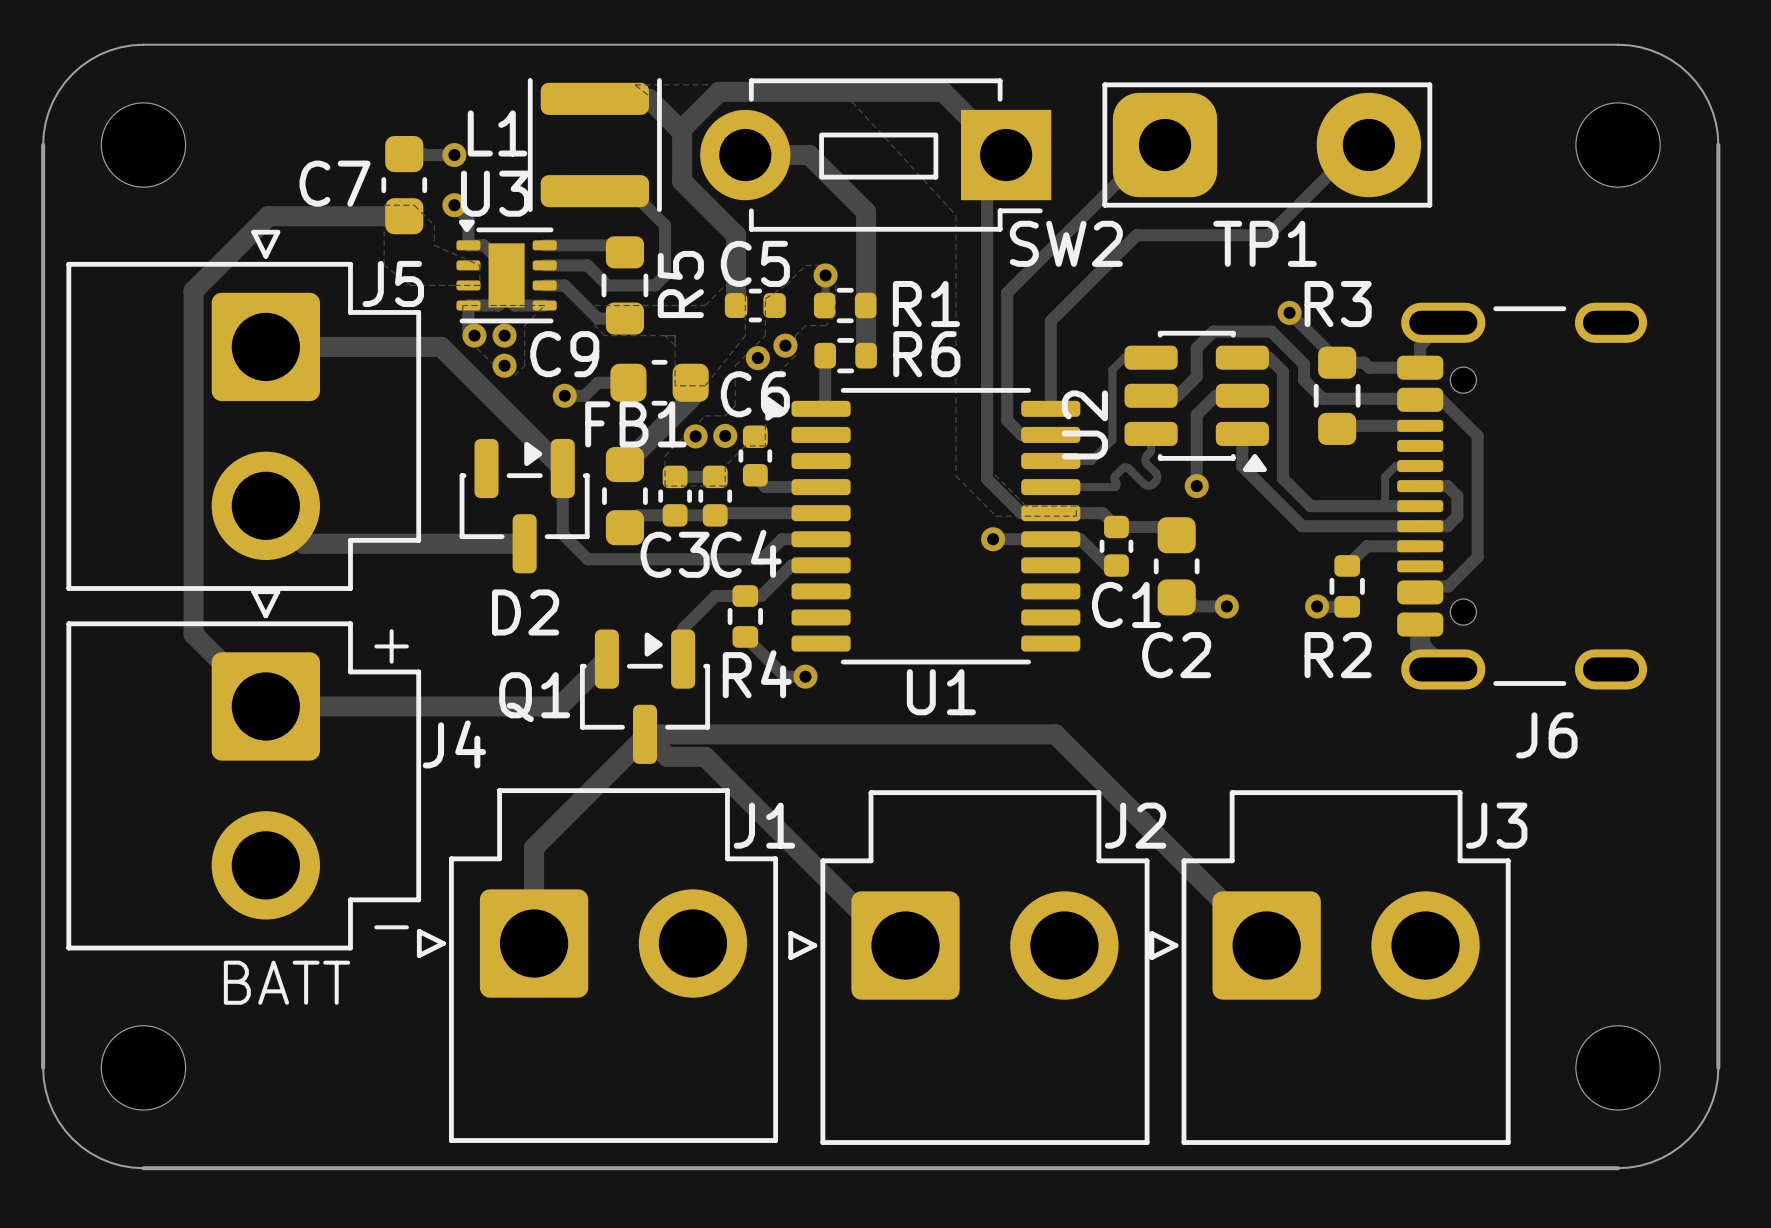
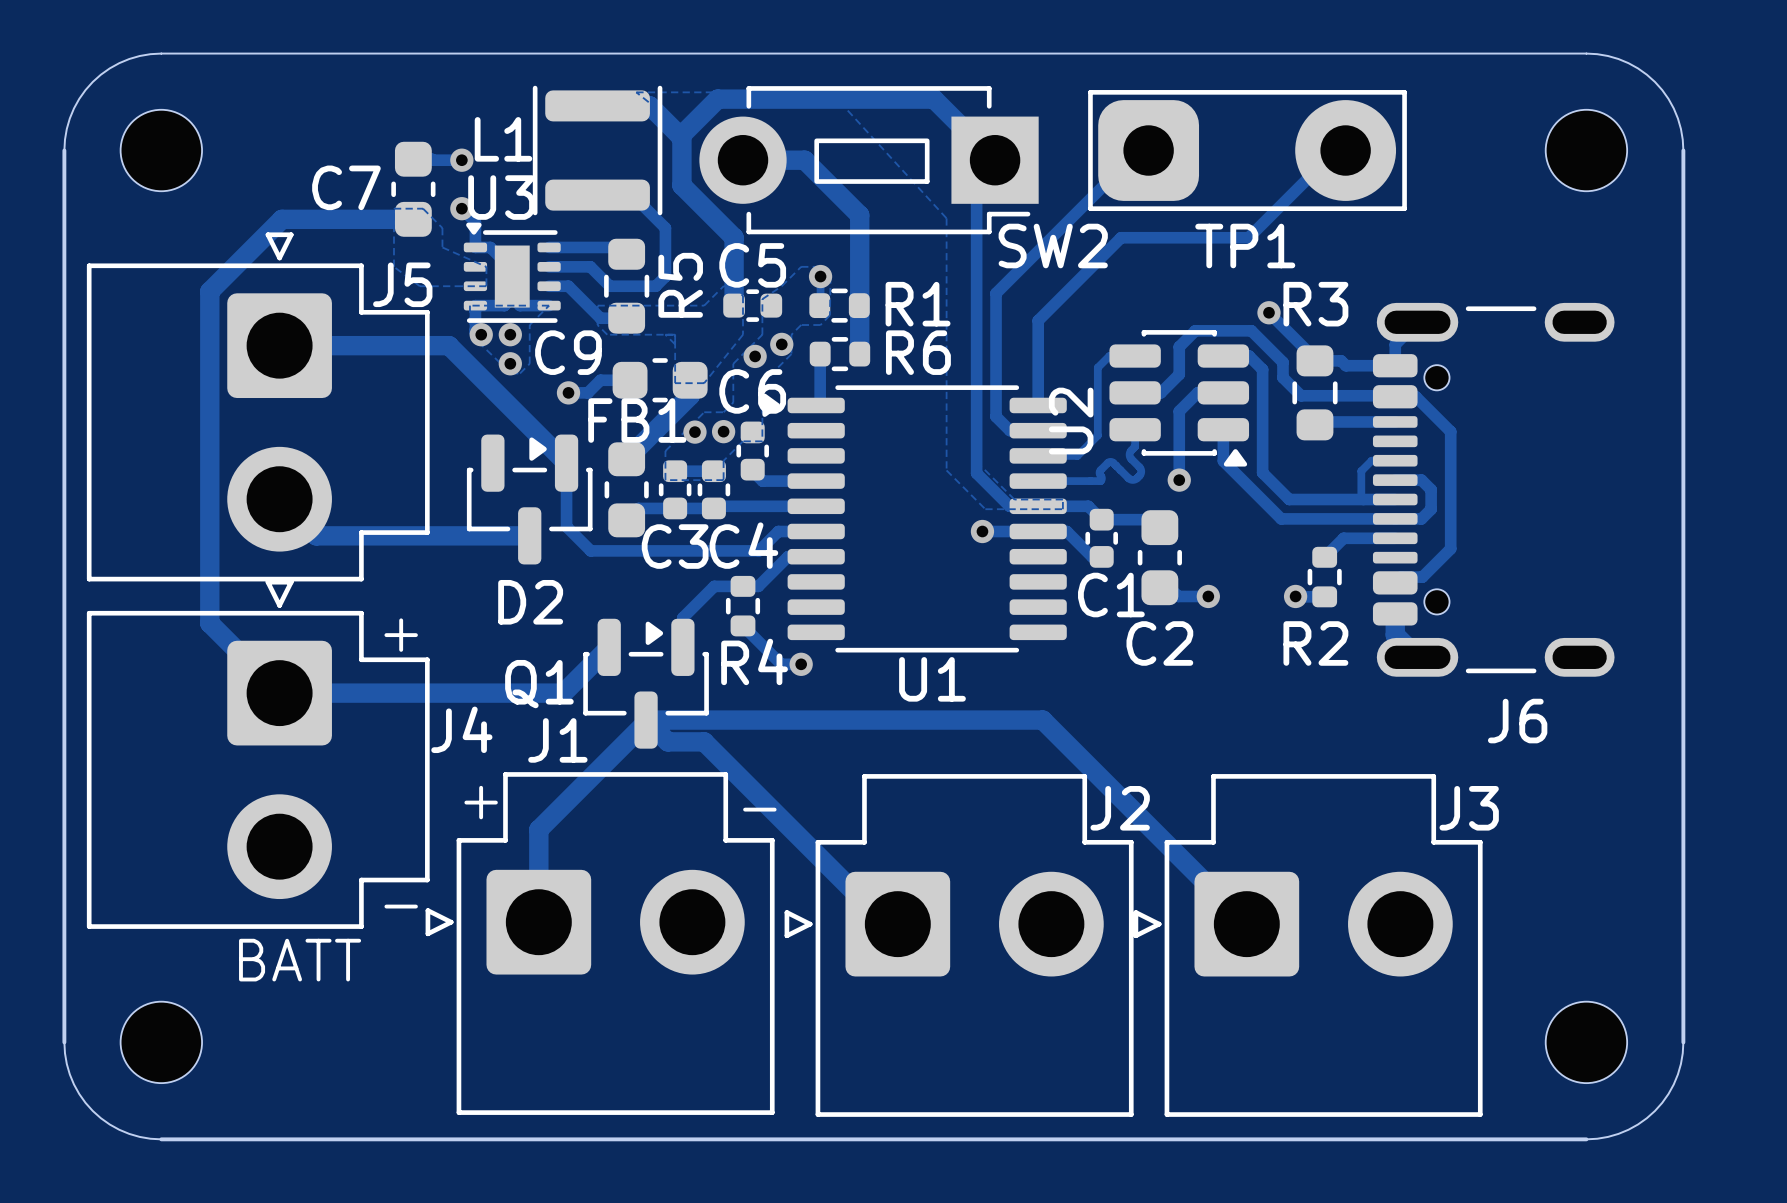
text: none -> + (481, 802)
J1 name position: J1 (764, 825) -> J1 (557, 740)
text: none -> - (759, 809)

